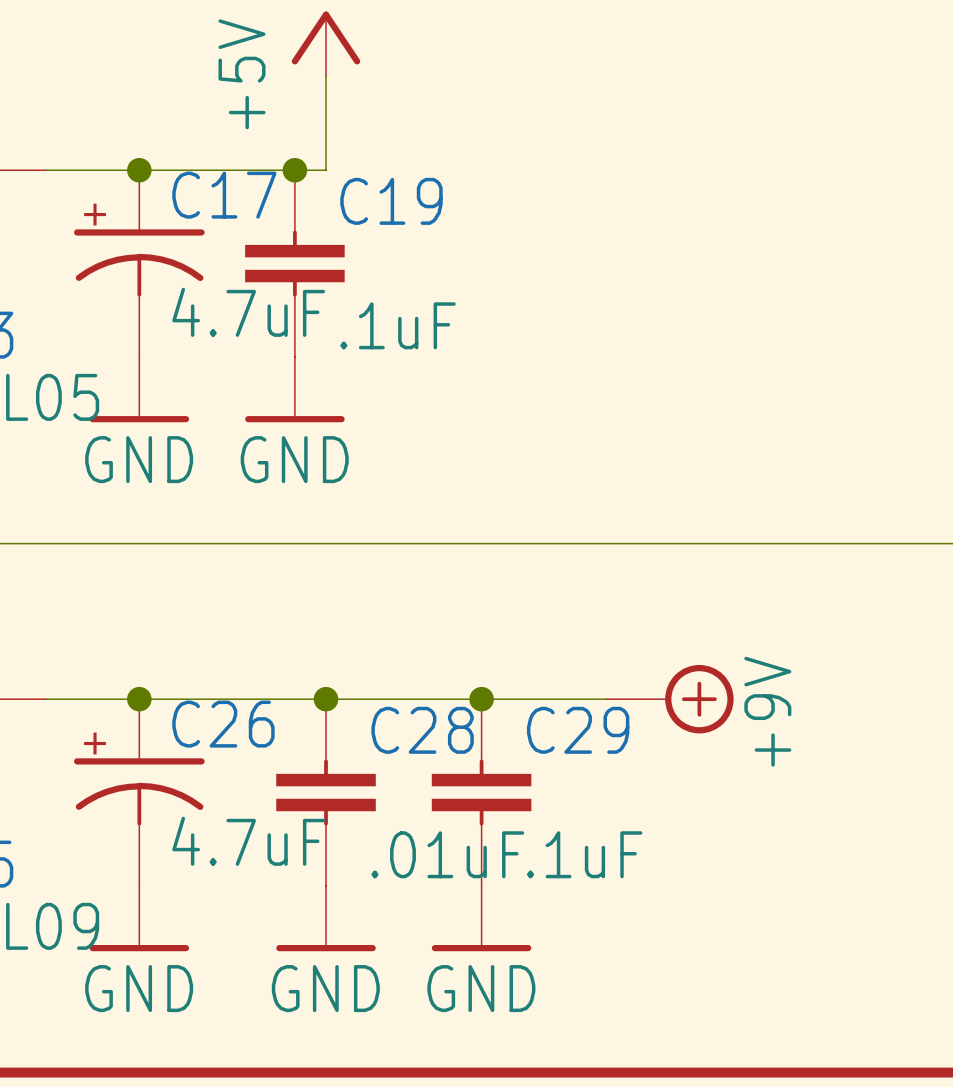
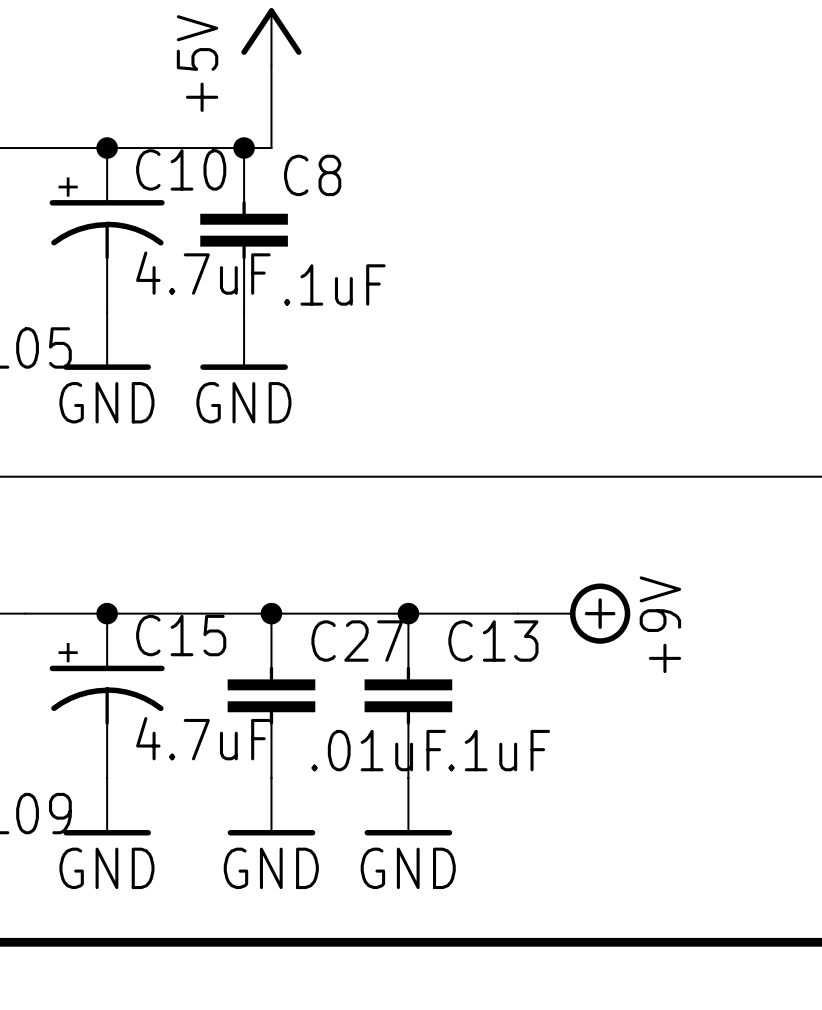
C17 name: C17 (224, 195) -> C10 (181, 169)
C19 name: C19 (391, 201) -> C8 (312, 175)
C26 name: C26 (223, 724) -> C15 (181, 635)
C28 name: C28 (422, 730) -> C27 (357, 641)
C29 name: C29 (578, 730) -> C13 (493, 641)

